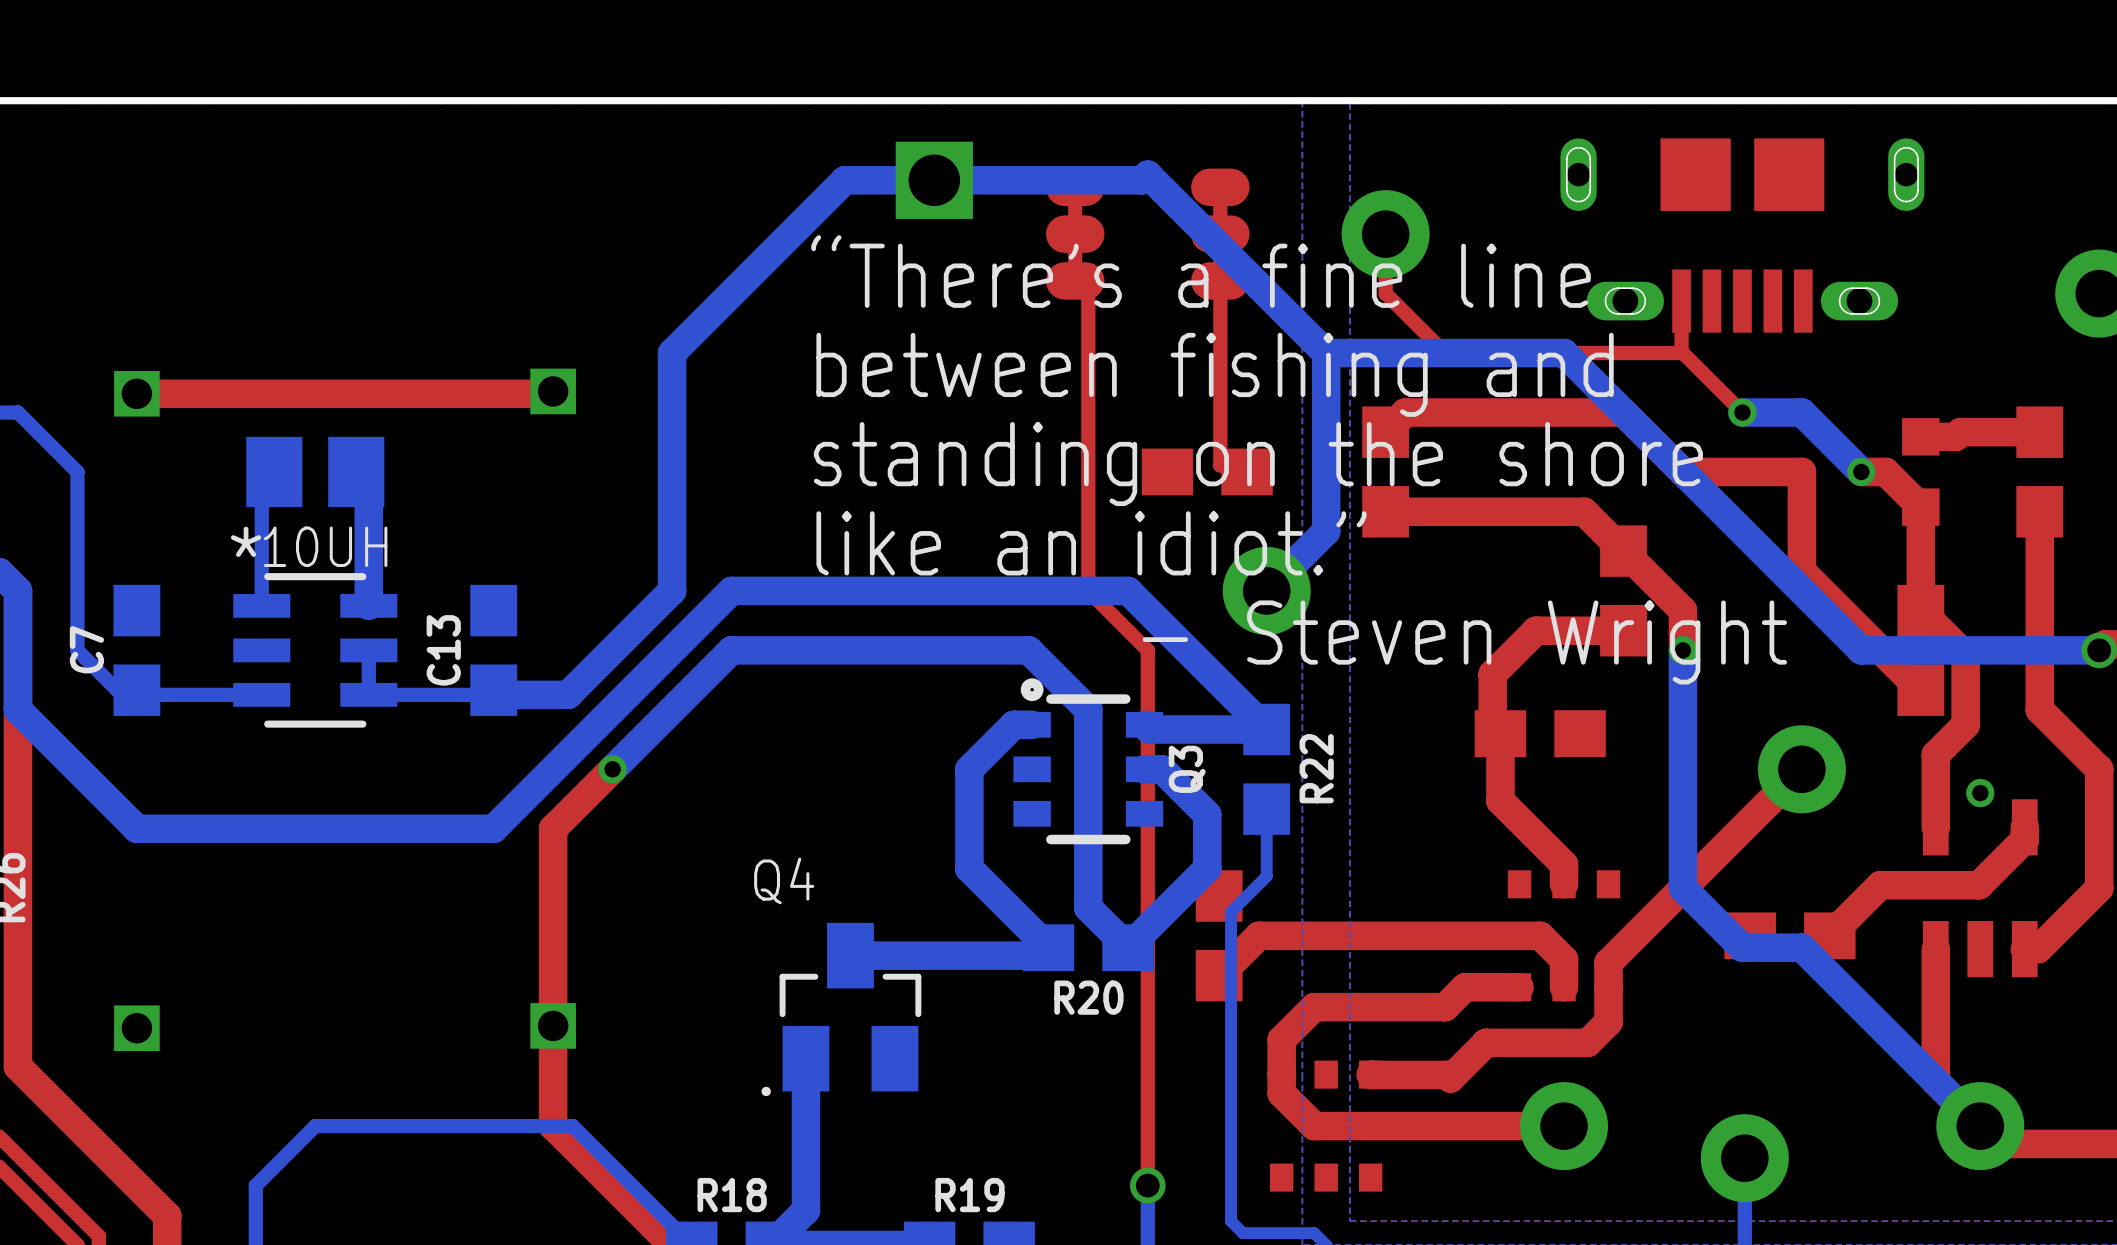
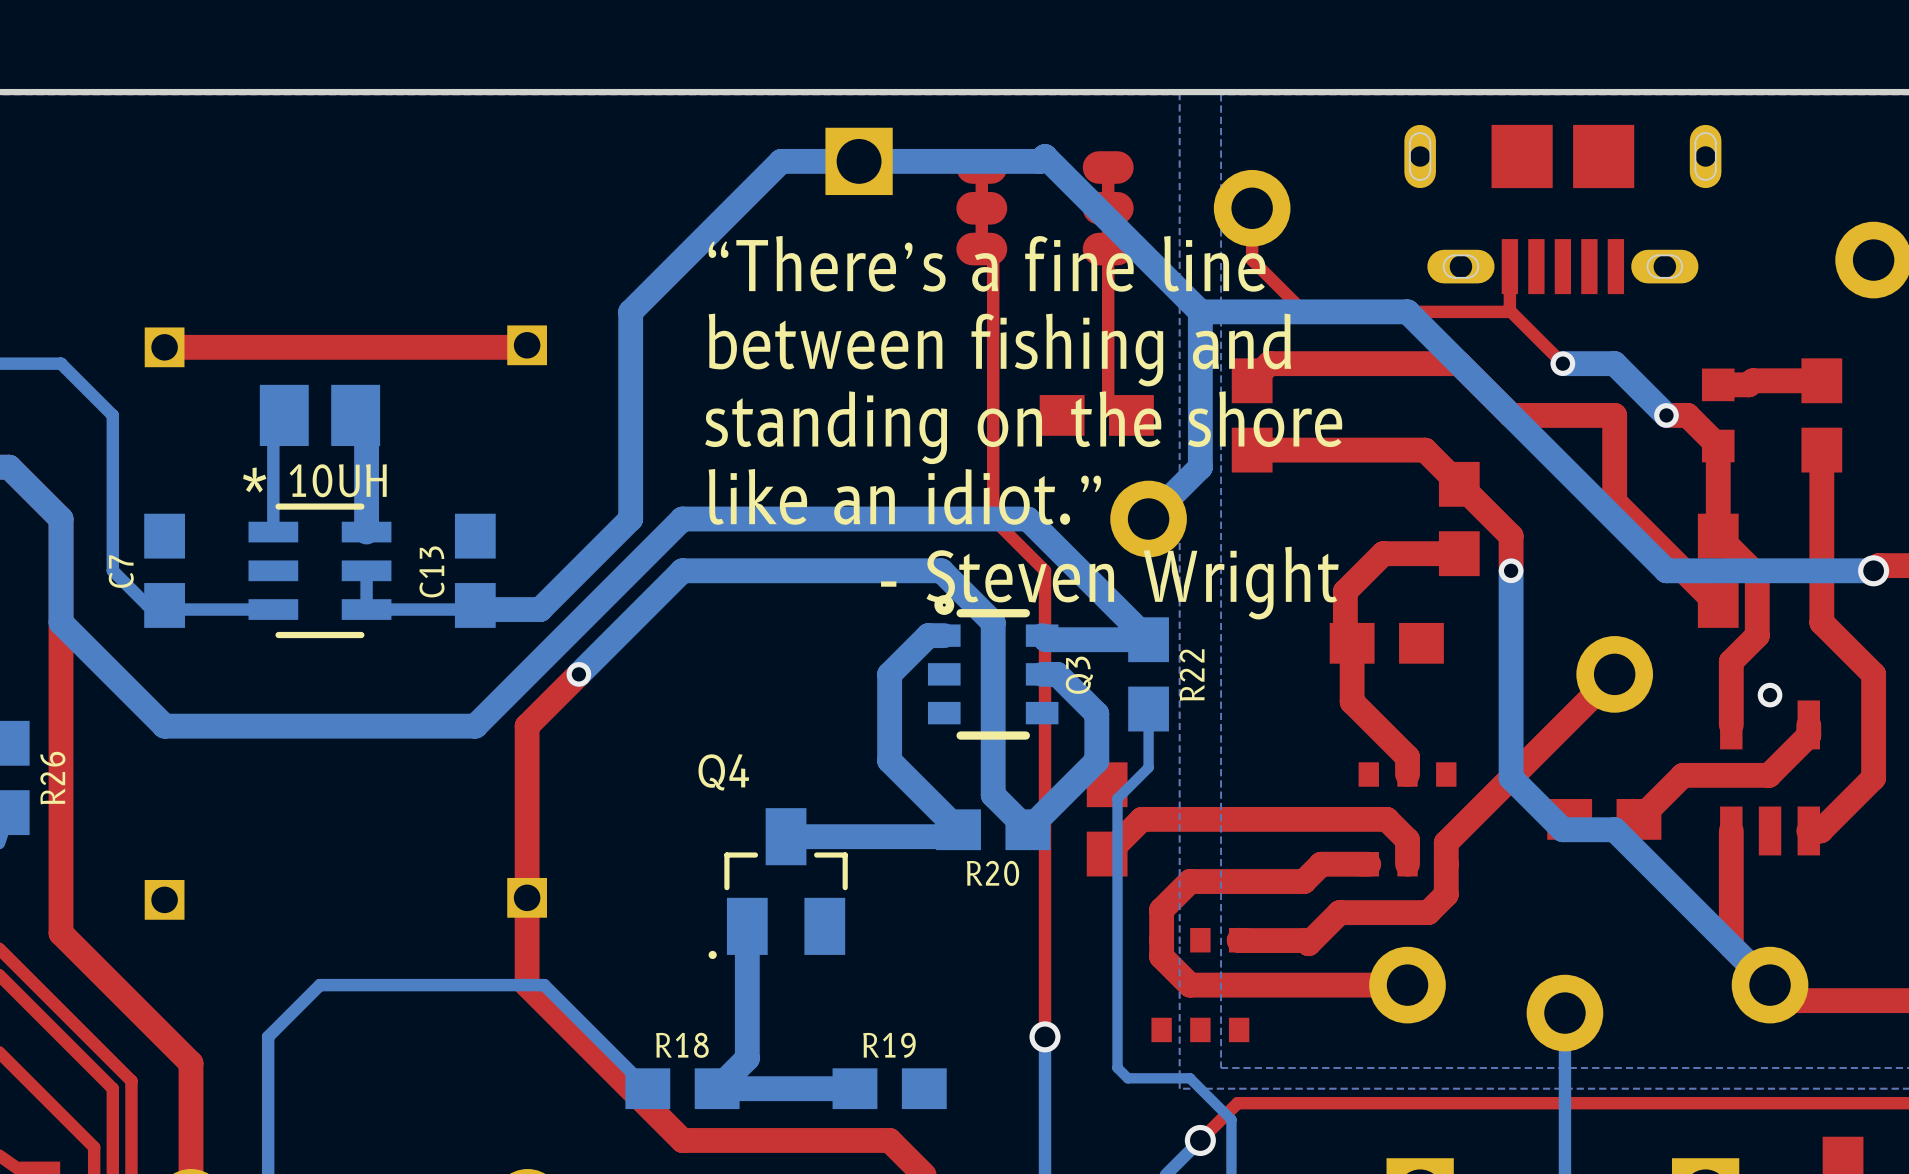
text position: “There’s a fine line (1201, 271) -> “There’s a fine line (987, 263)
text position: between fishing and (1215, 374) -> between fishing and (999, 350)
text position: standing on the shore (1258, 464) -> standing on the shore (1023, 427)
text position: like an idiot.” (1091, 543) -> like an idiot.” (904, 496)
text position: - Steven Wright (1464, 642) -> - Steven Wright (1109, 583)

